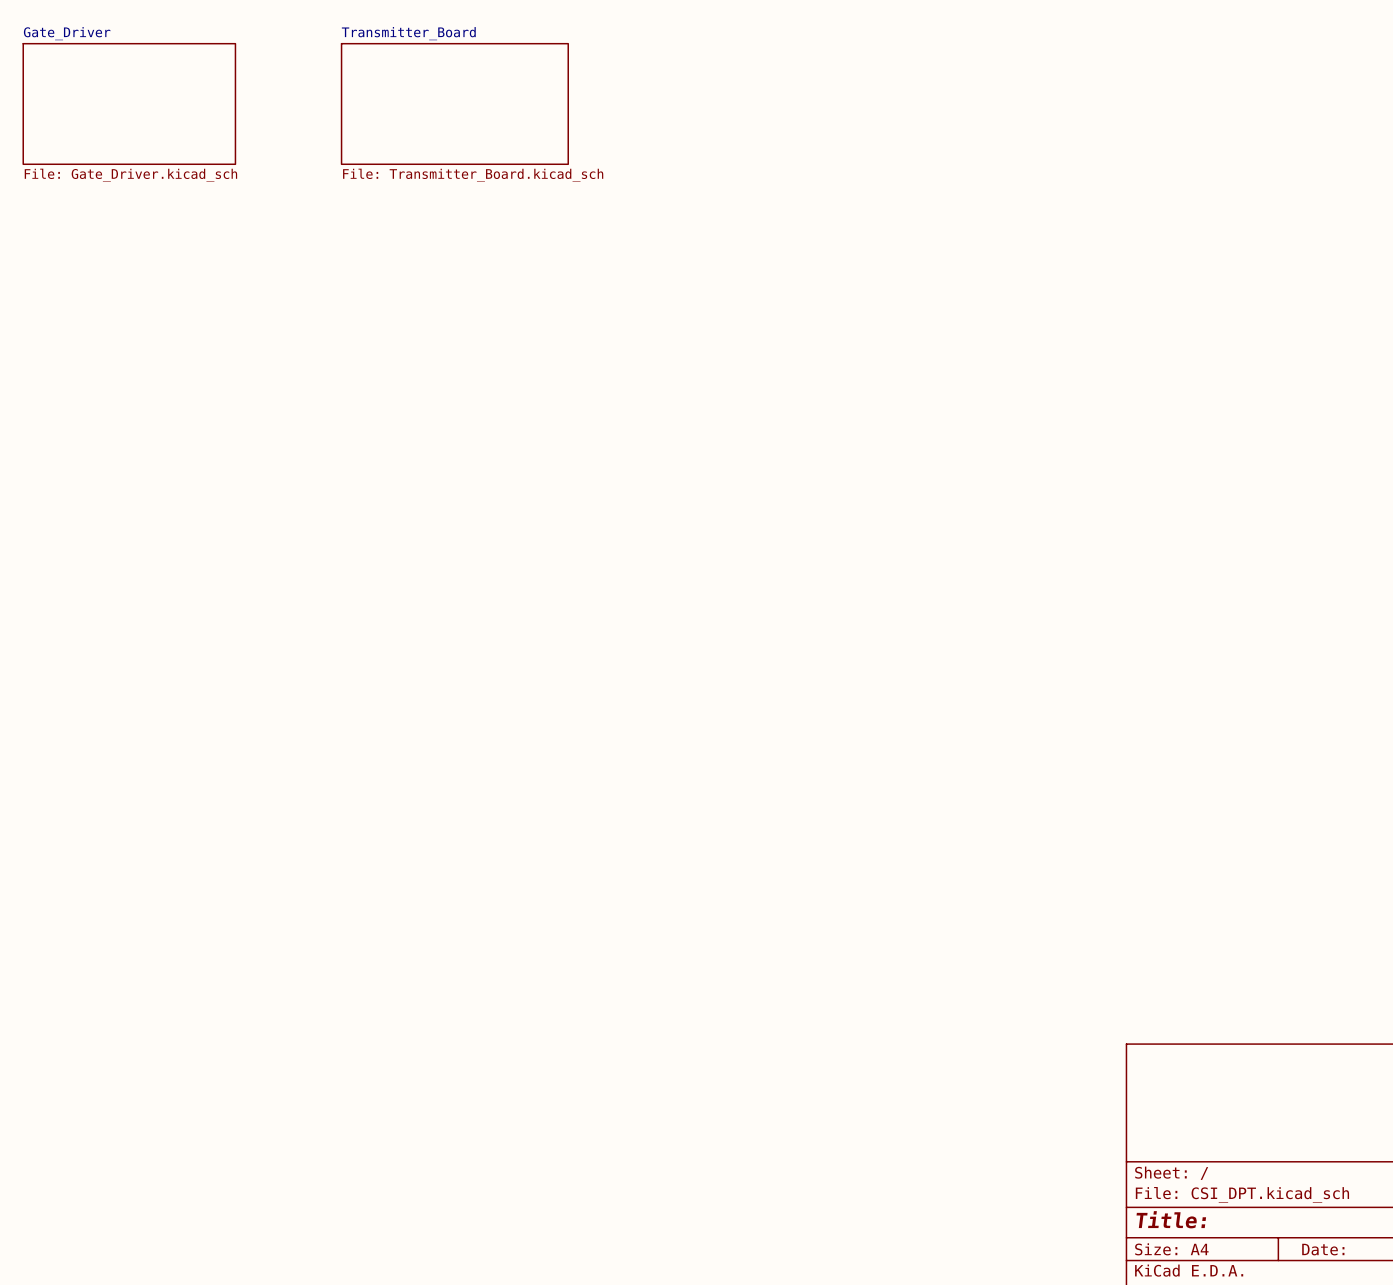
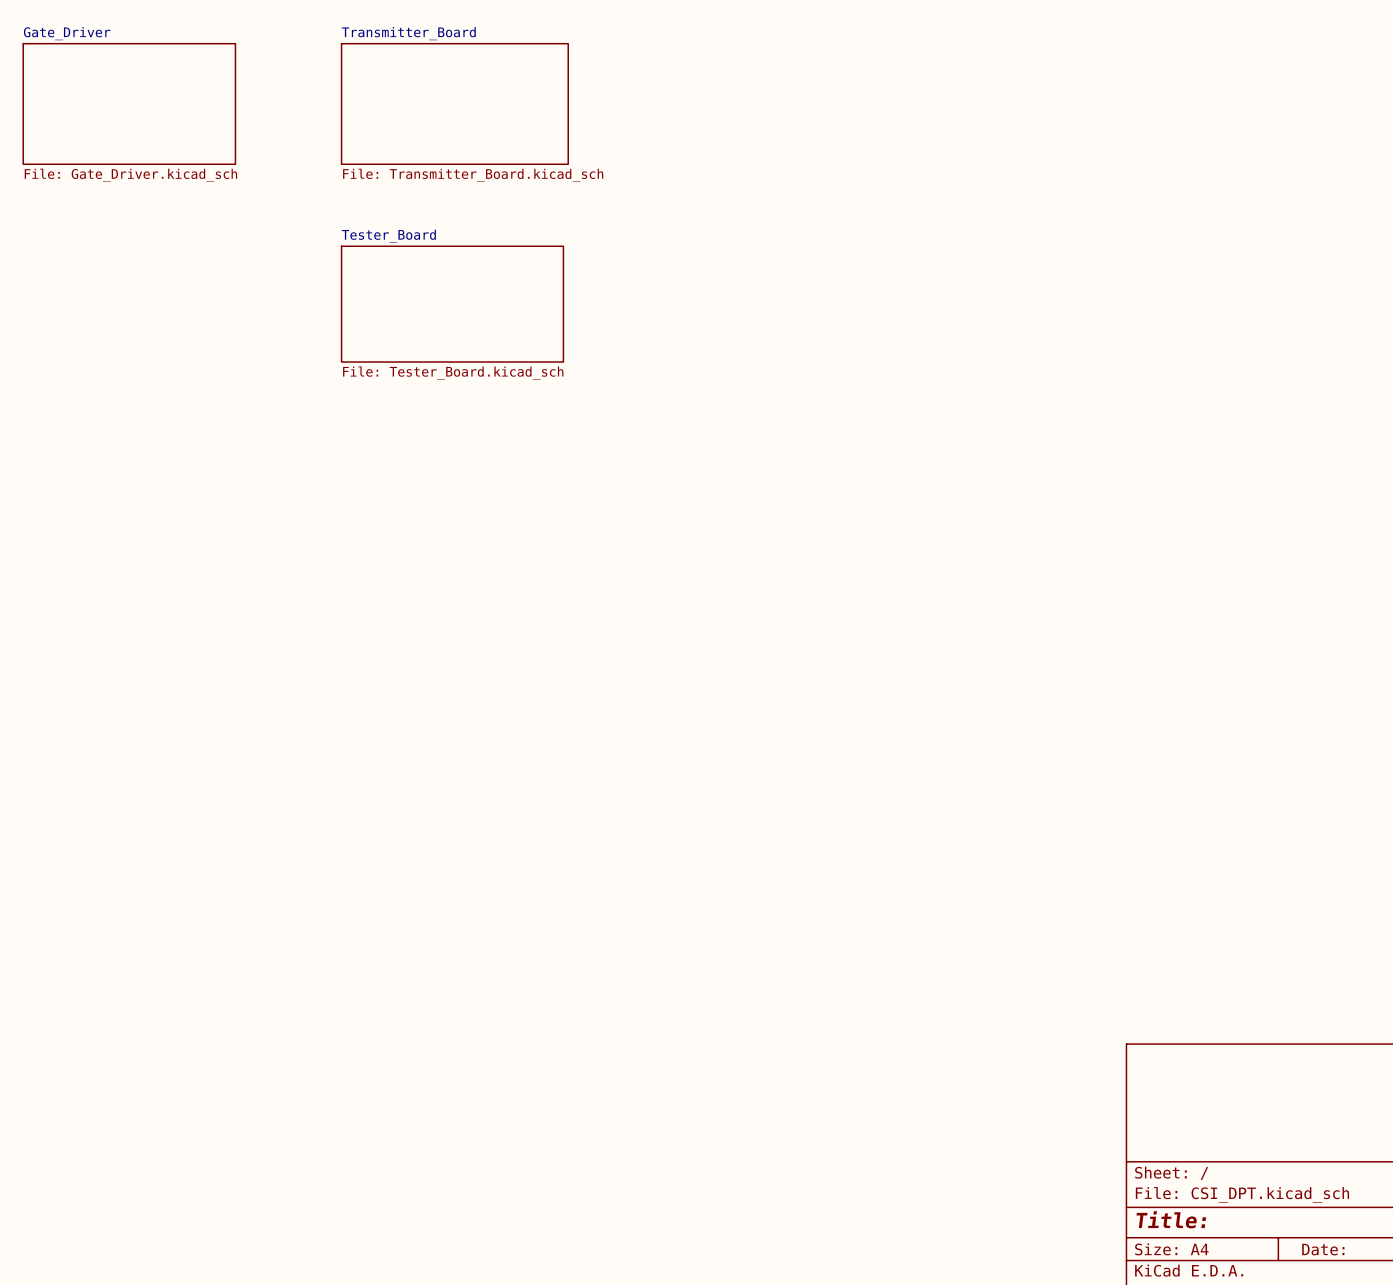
sheet Tester_Board: none -> File: Tester_Board.kicad_sch (452, 304)

